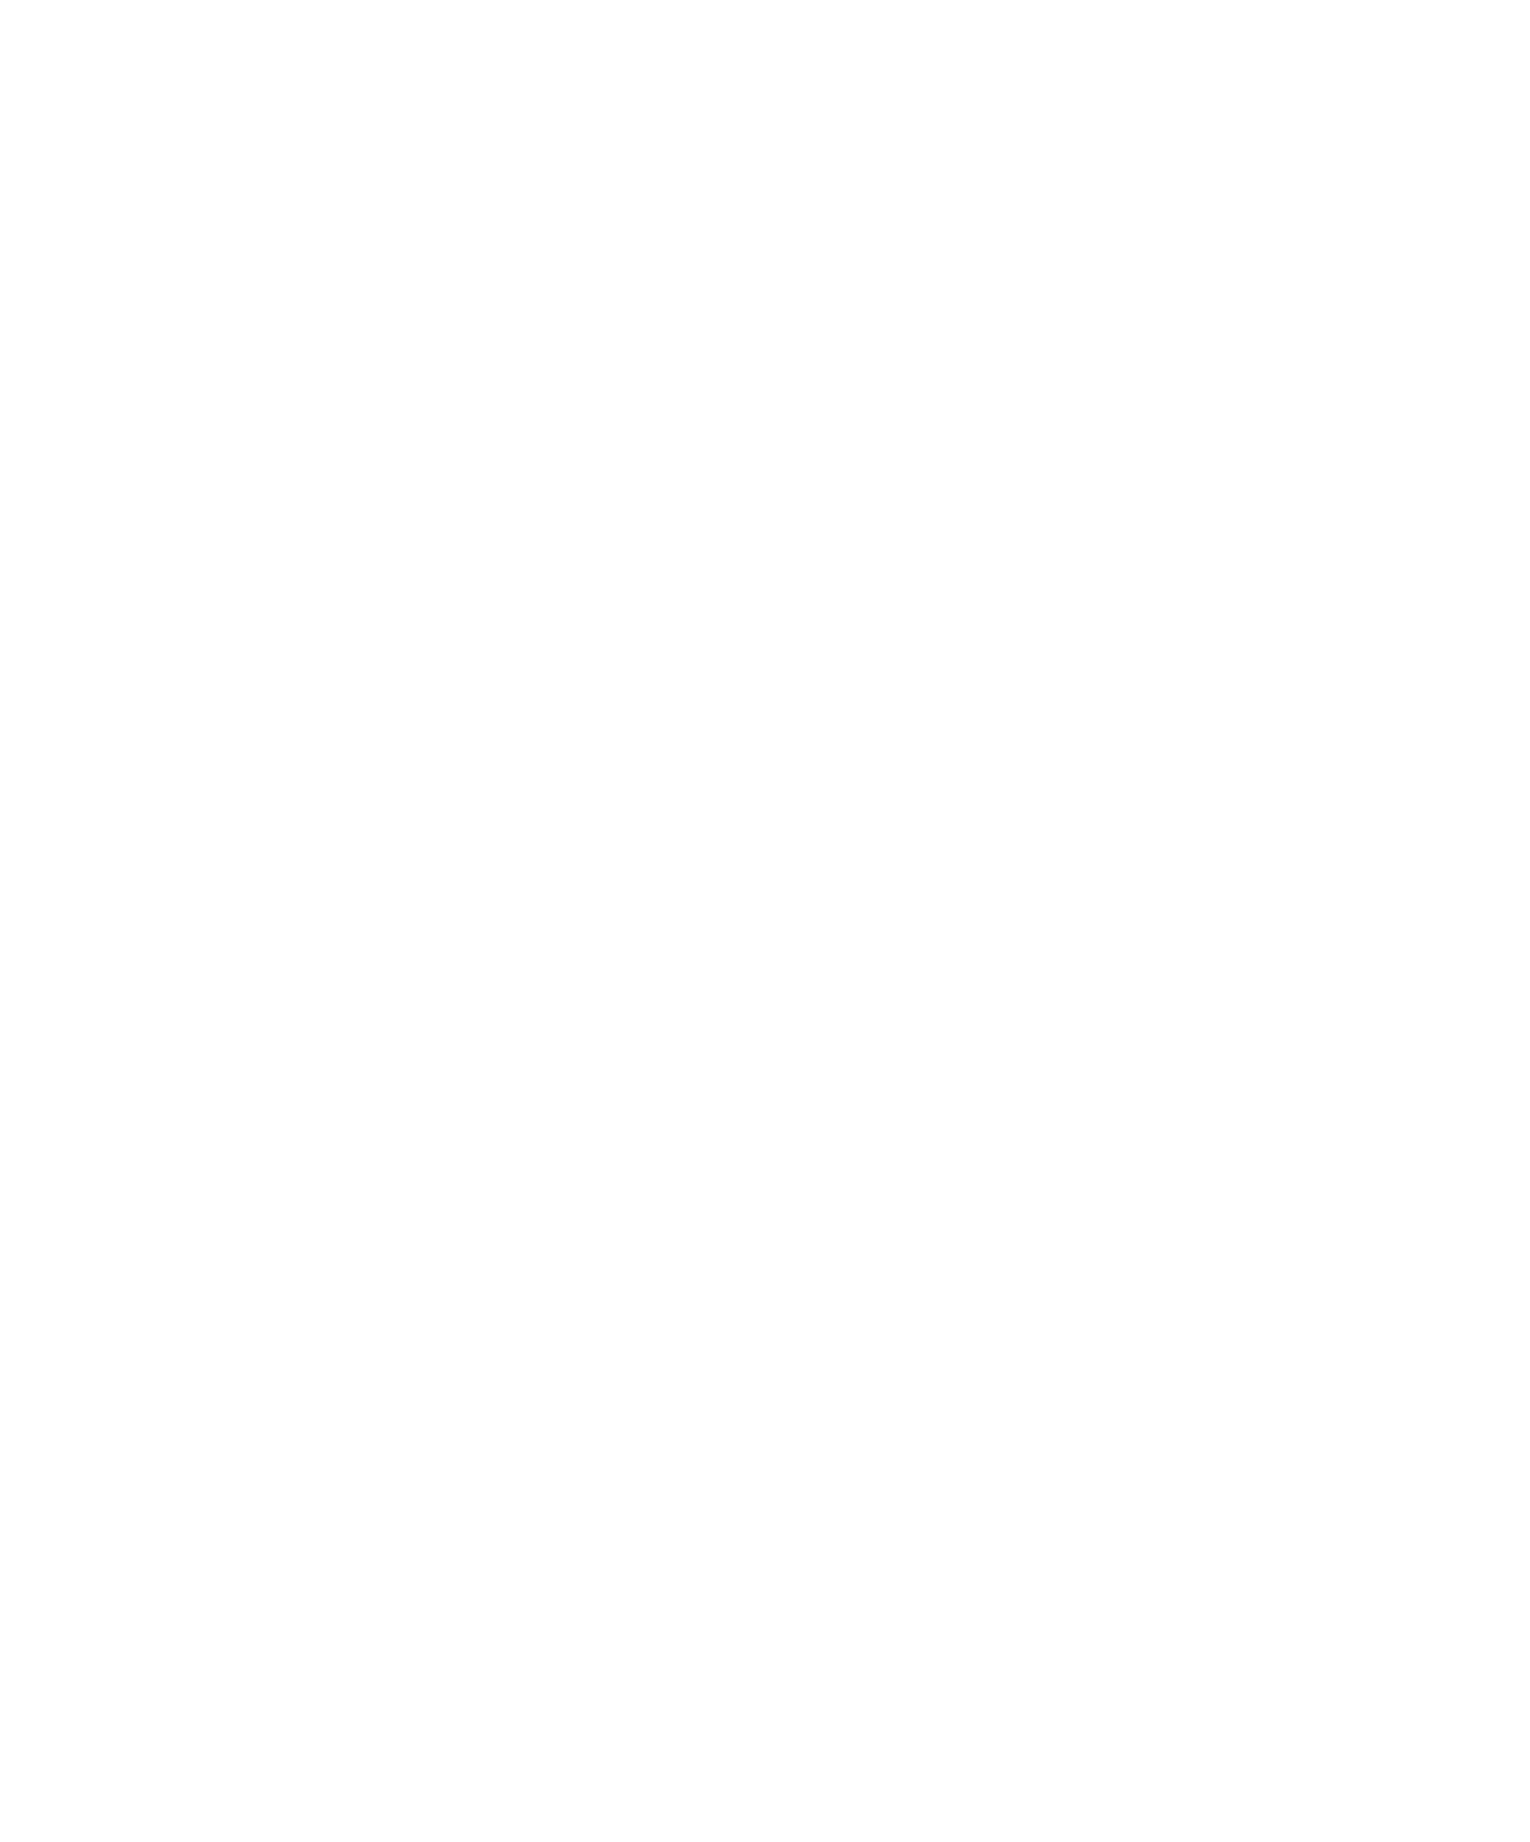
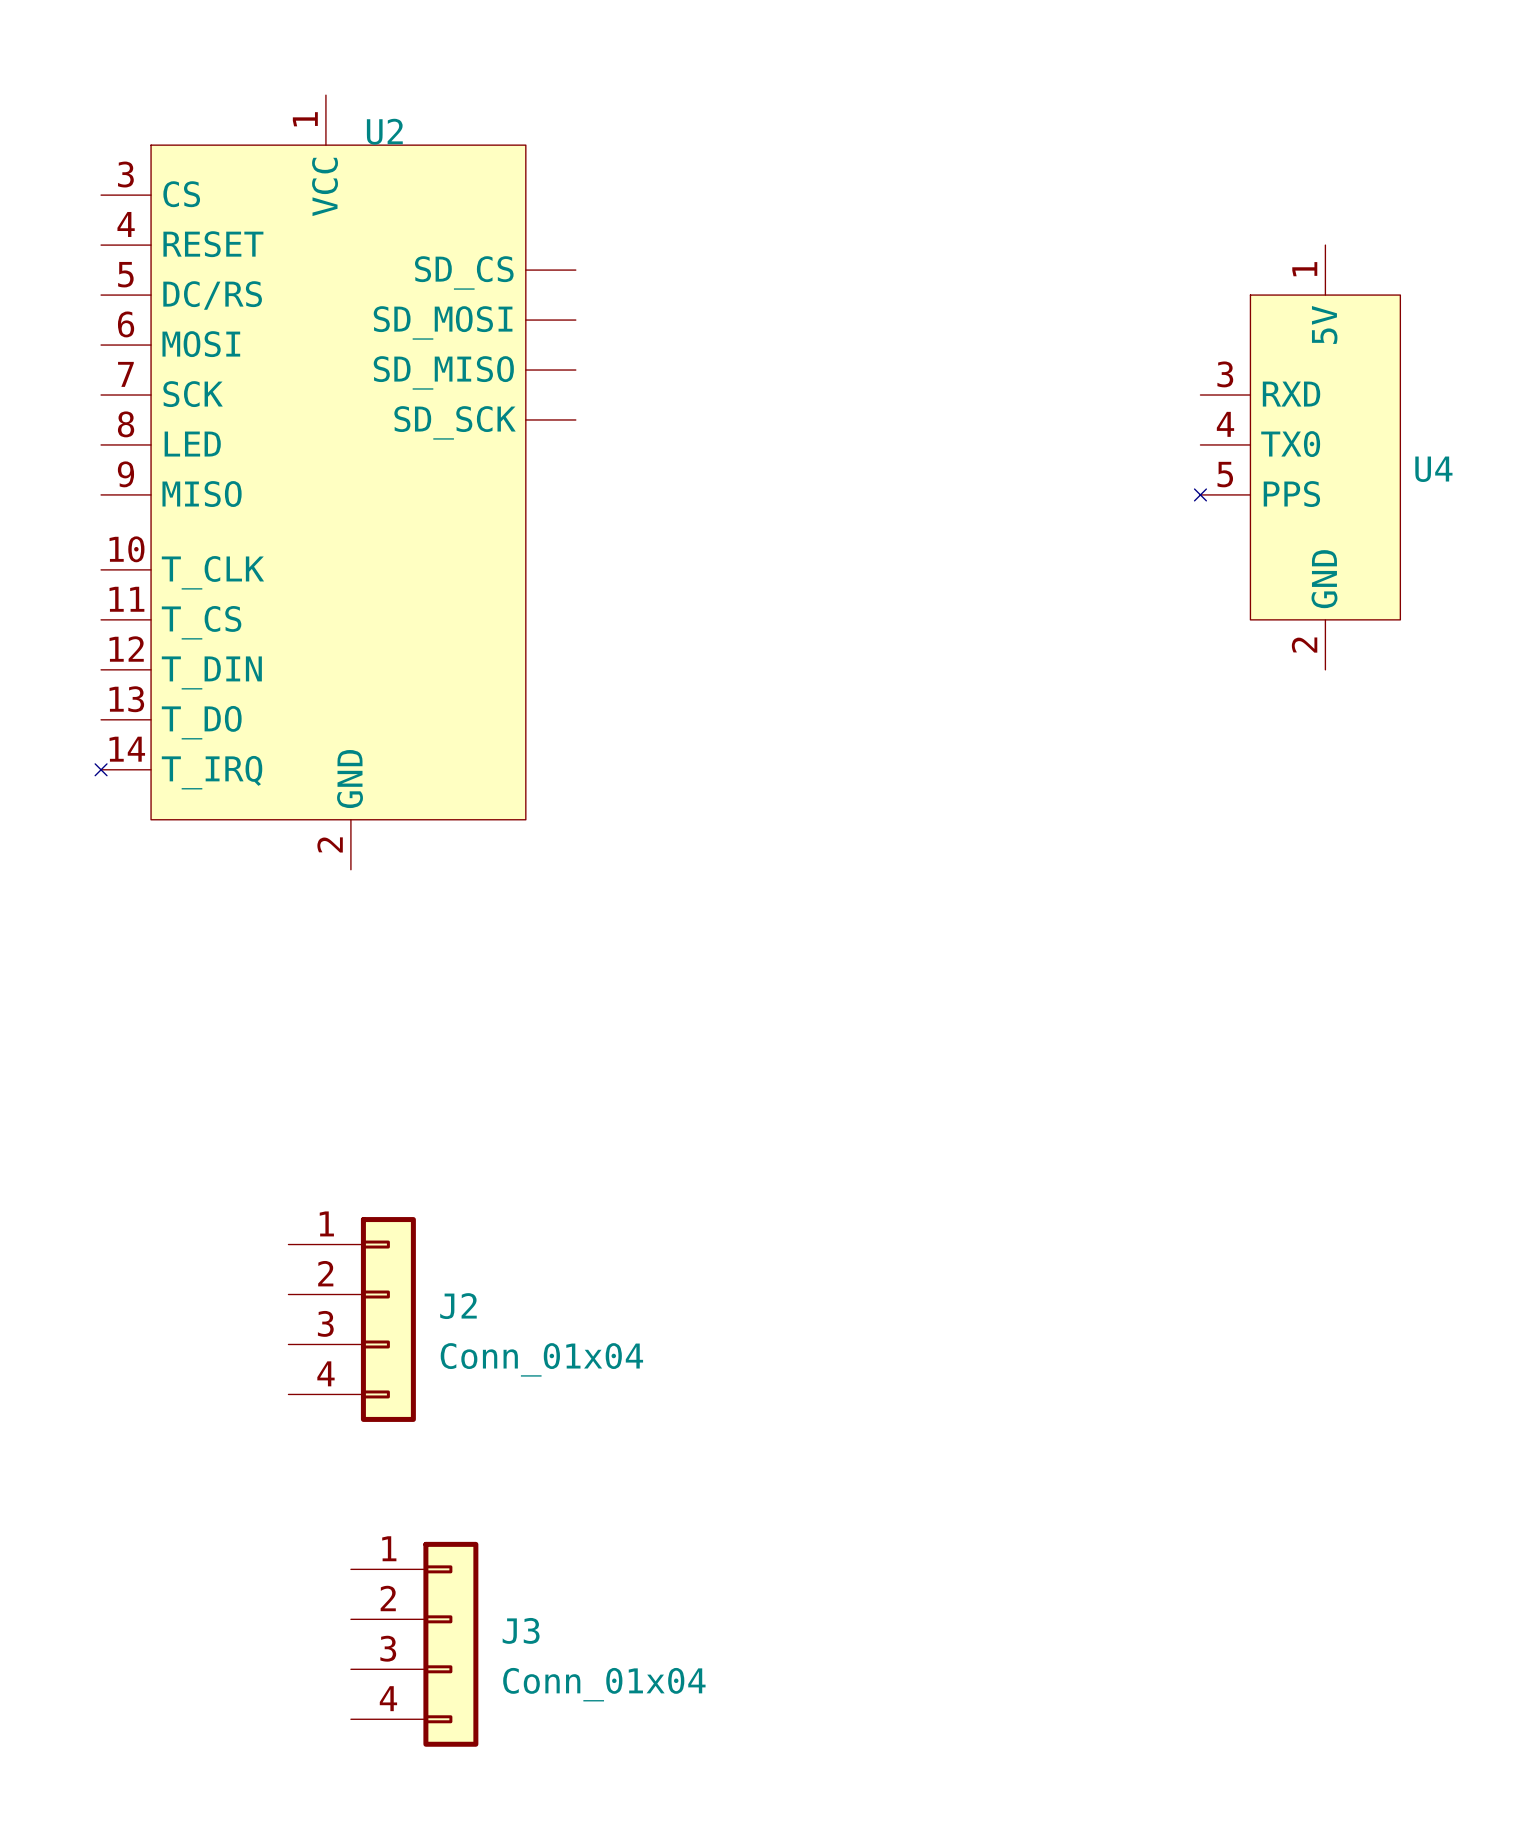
U4: none -> (1297, 457)
U2: none -> (335, 482)
J2: none -> Conn_01x04 (352, 1319)
J3: none -> Conn_01x04 (414, 1644)

